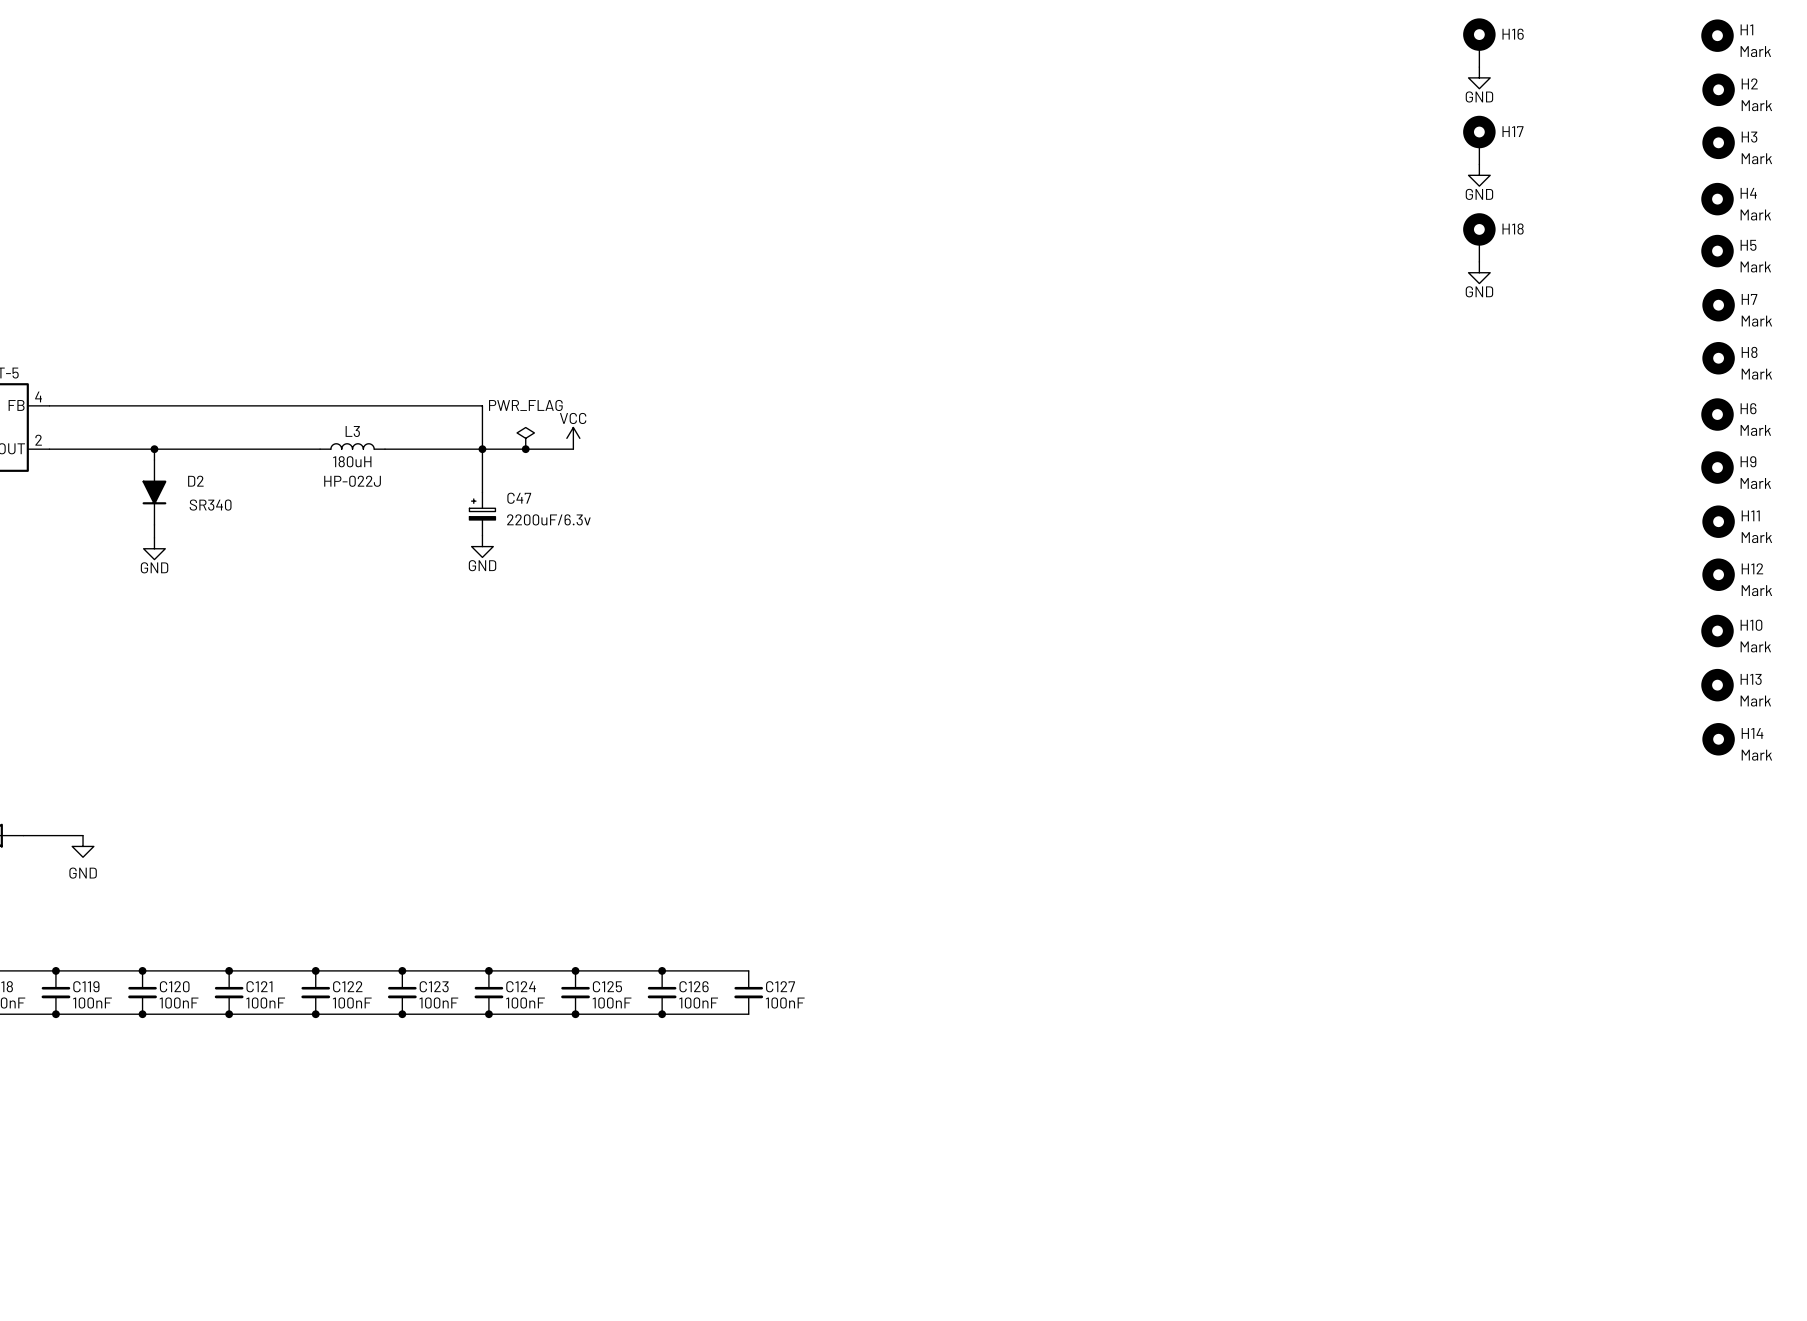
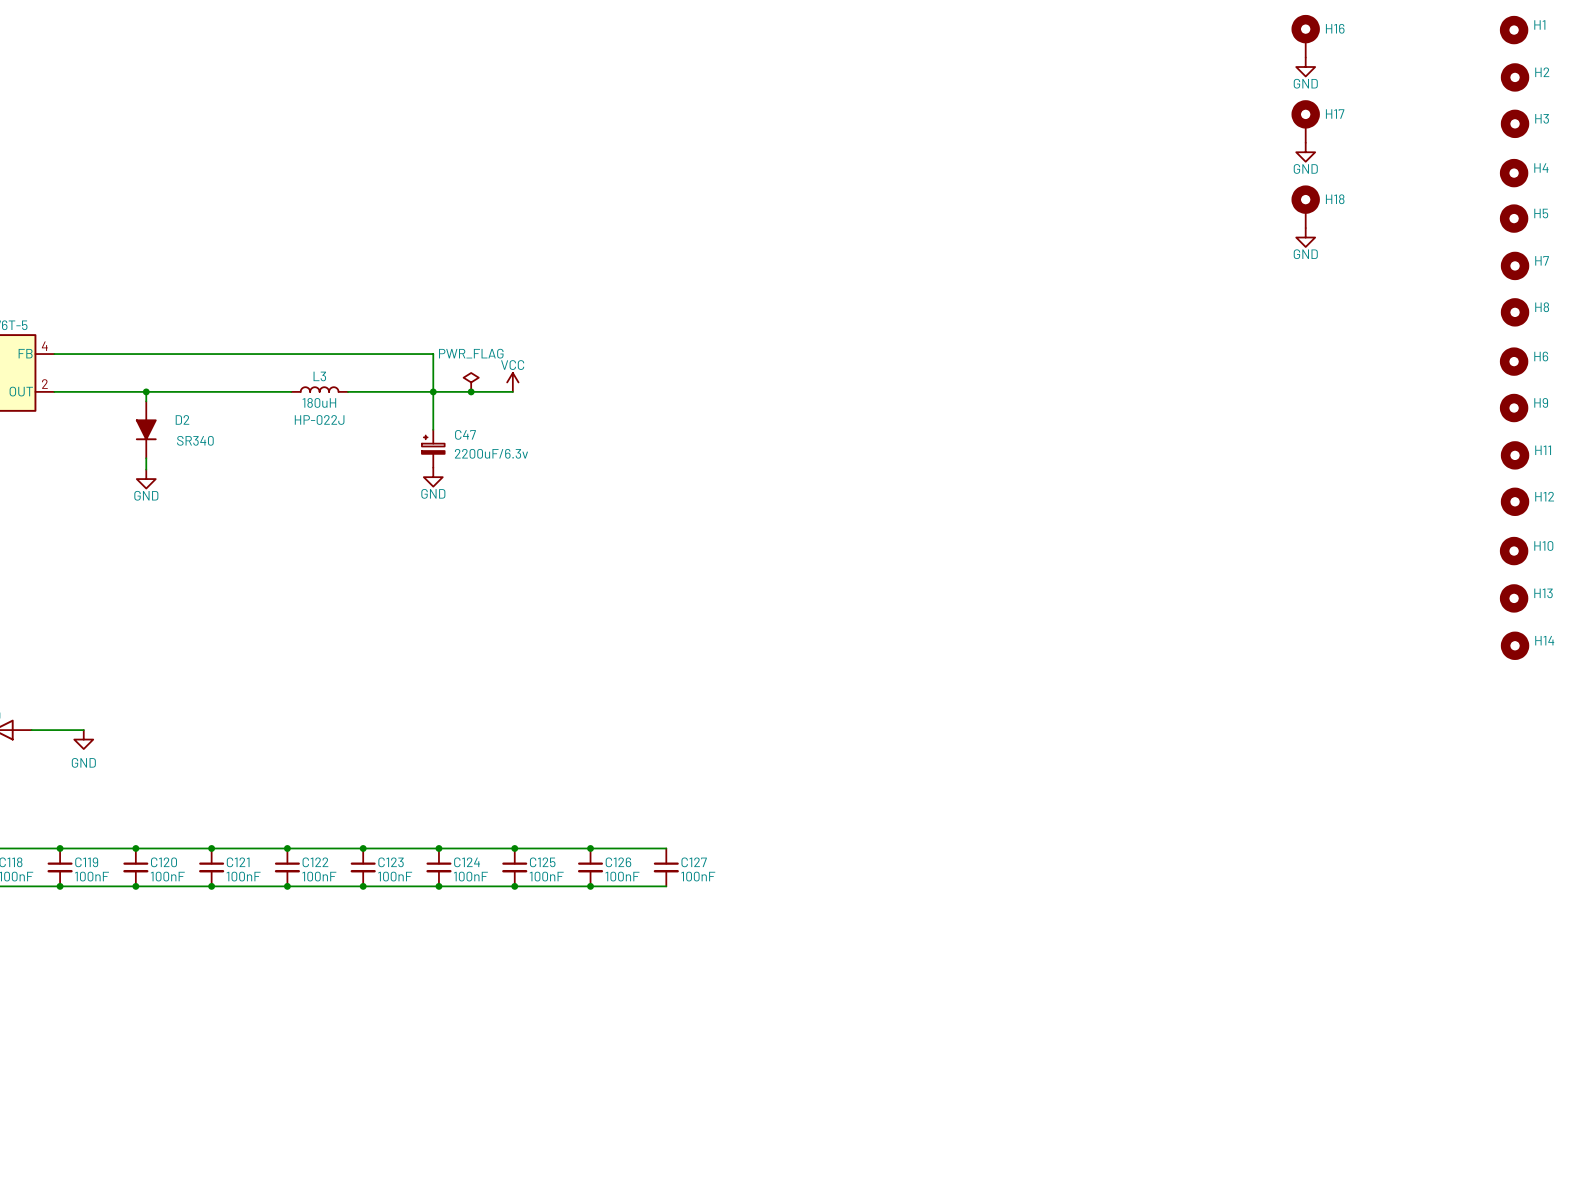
H1 value: Mark (1755, 51) -> none
H2 value: Mark (1756, 105) -> none
H3 value: Mark (1756, 158) -> none
H4 value: Mark (1755, 215) -> none
H5 value: Mark (1755, 266) -> none
H7 value: Mark (1756, 321) -> none
H8 value: Mark (1756, 374) -> none
H6 value: Mark (1755, 430) -> none
H9 value: Mark (1755, 483) -> none
H11 value: Mark (1756, 537) -> none
H12 value: Mark (1756, 590) -> none
H10 value: Mark (1755, 646) -> none
H13 value: Mark (1755, 701) -> none
H14 value: Mark (1756, 755) -> none

